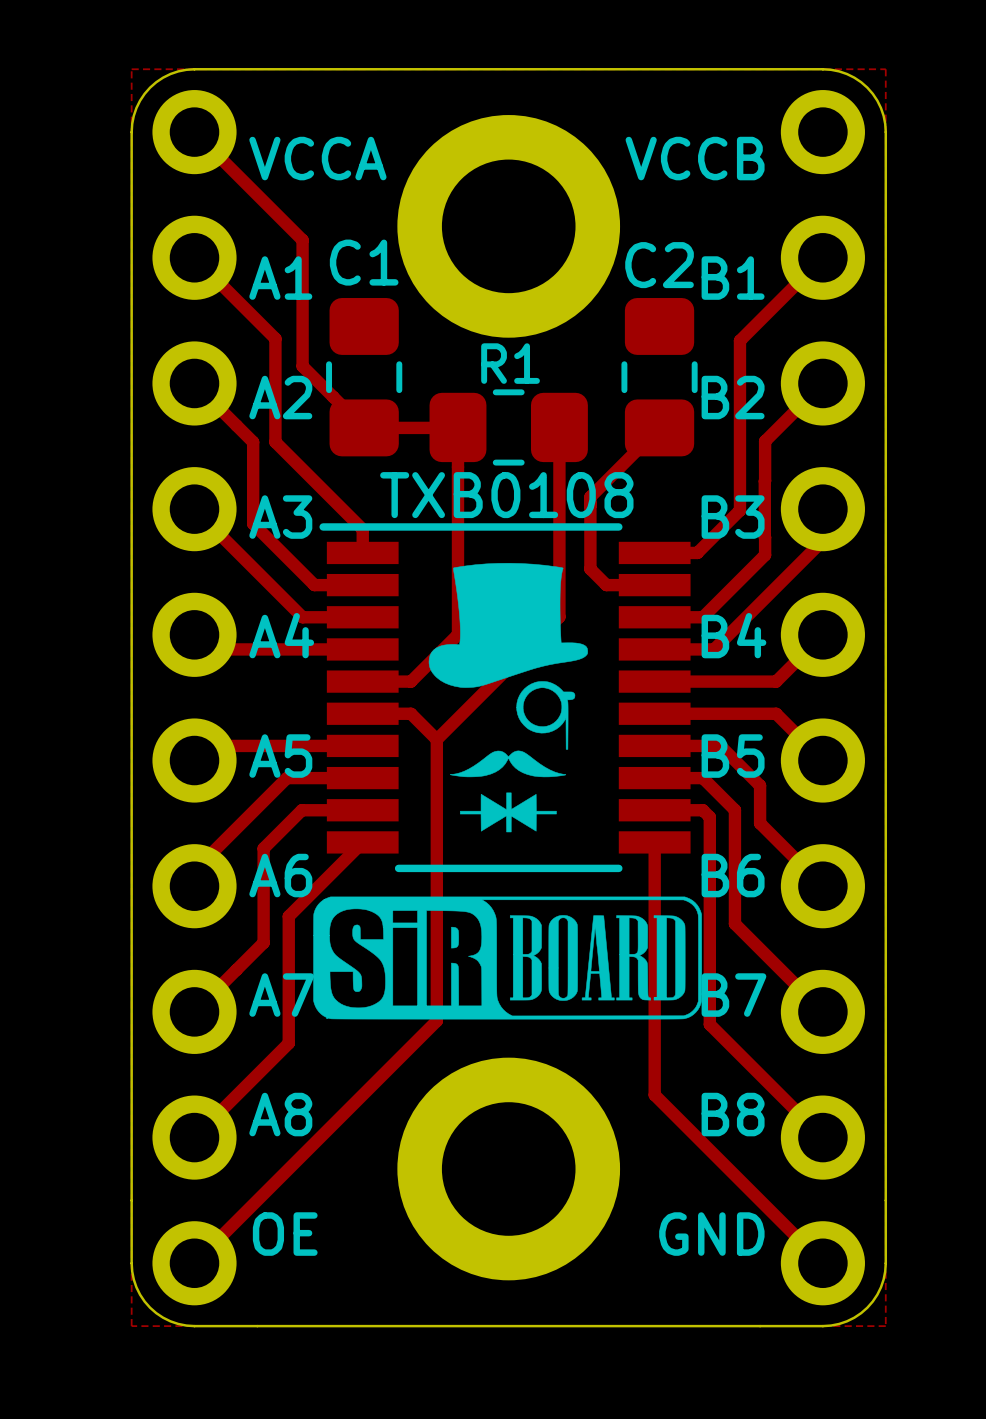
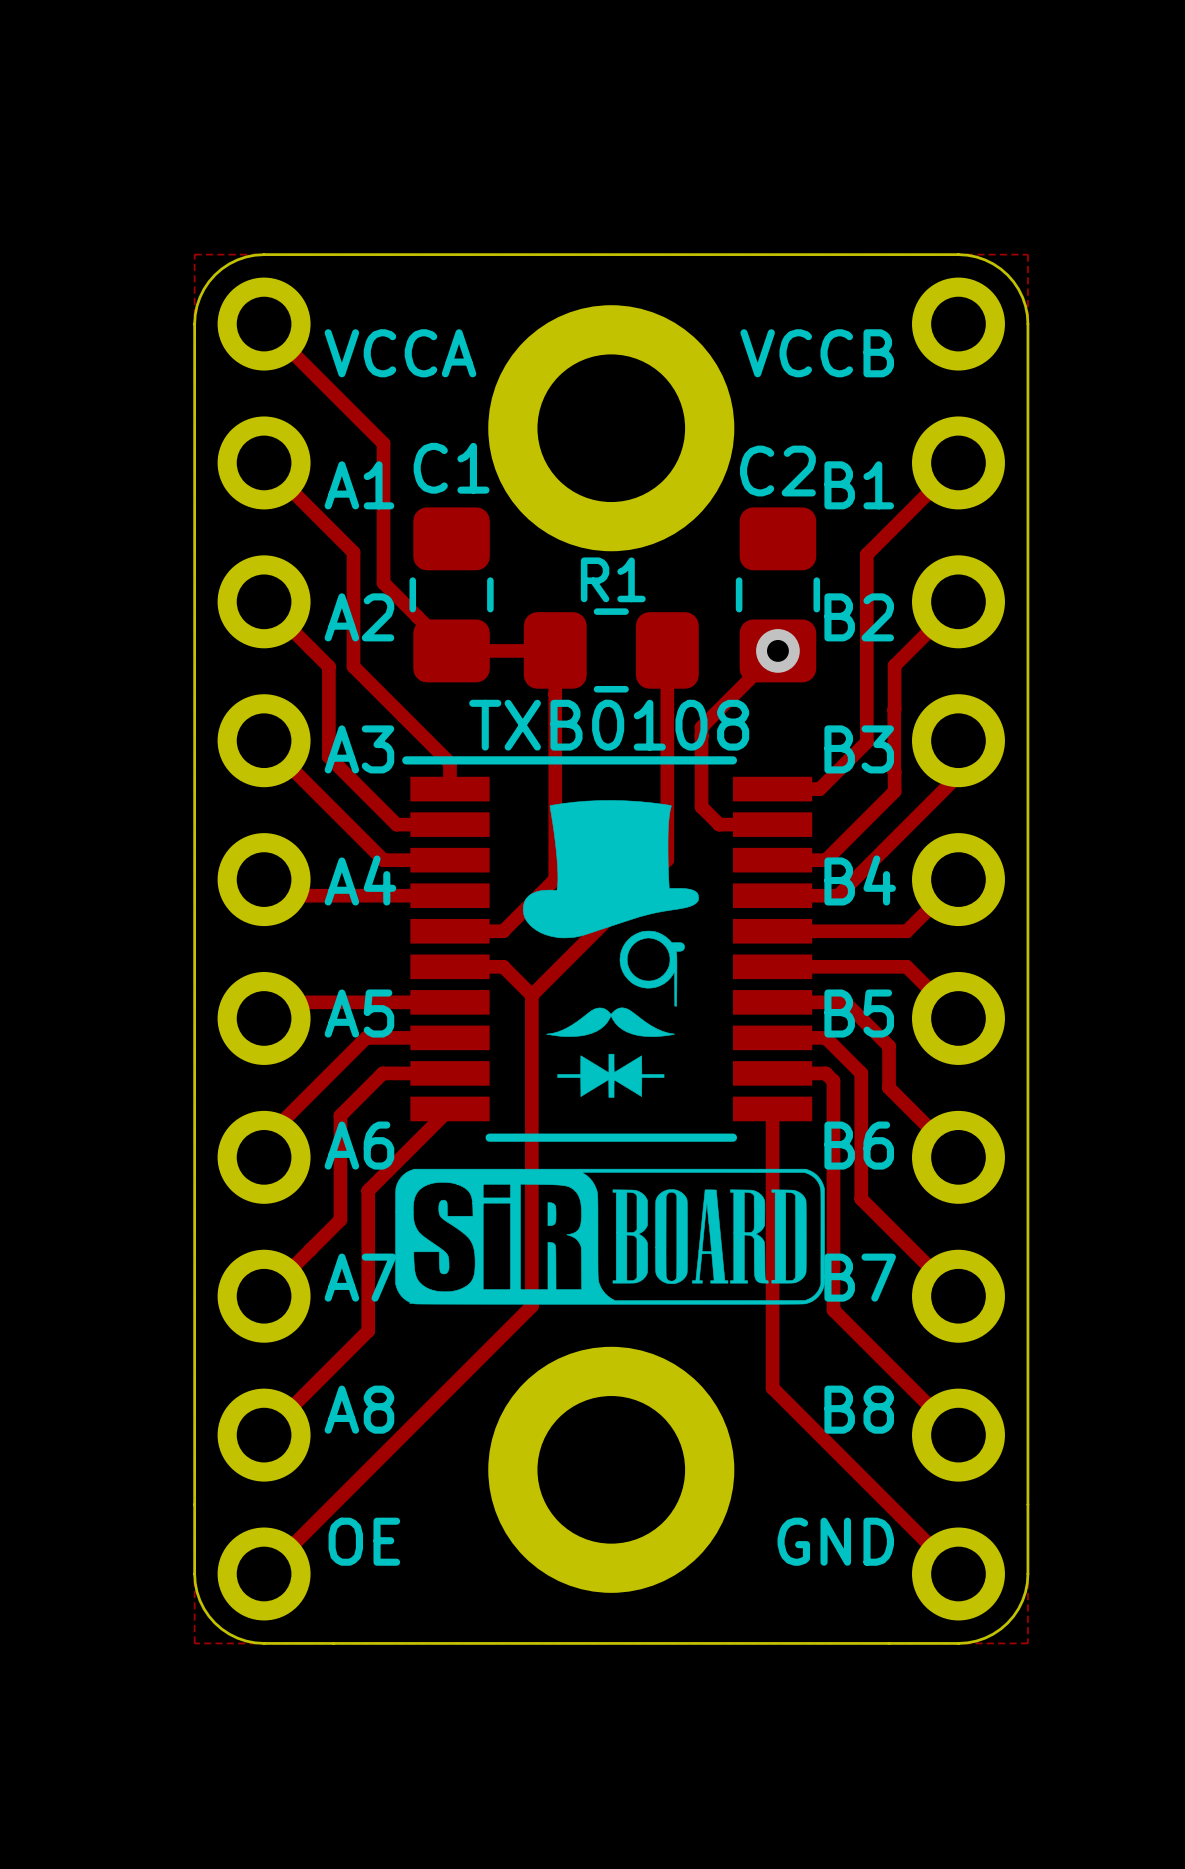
via: none -> (777, 650)

